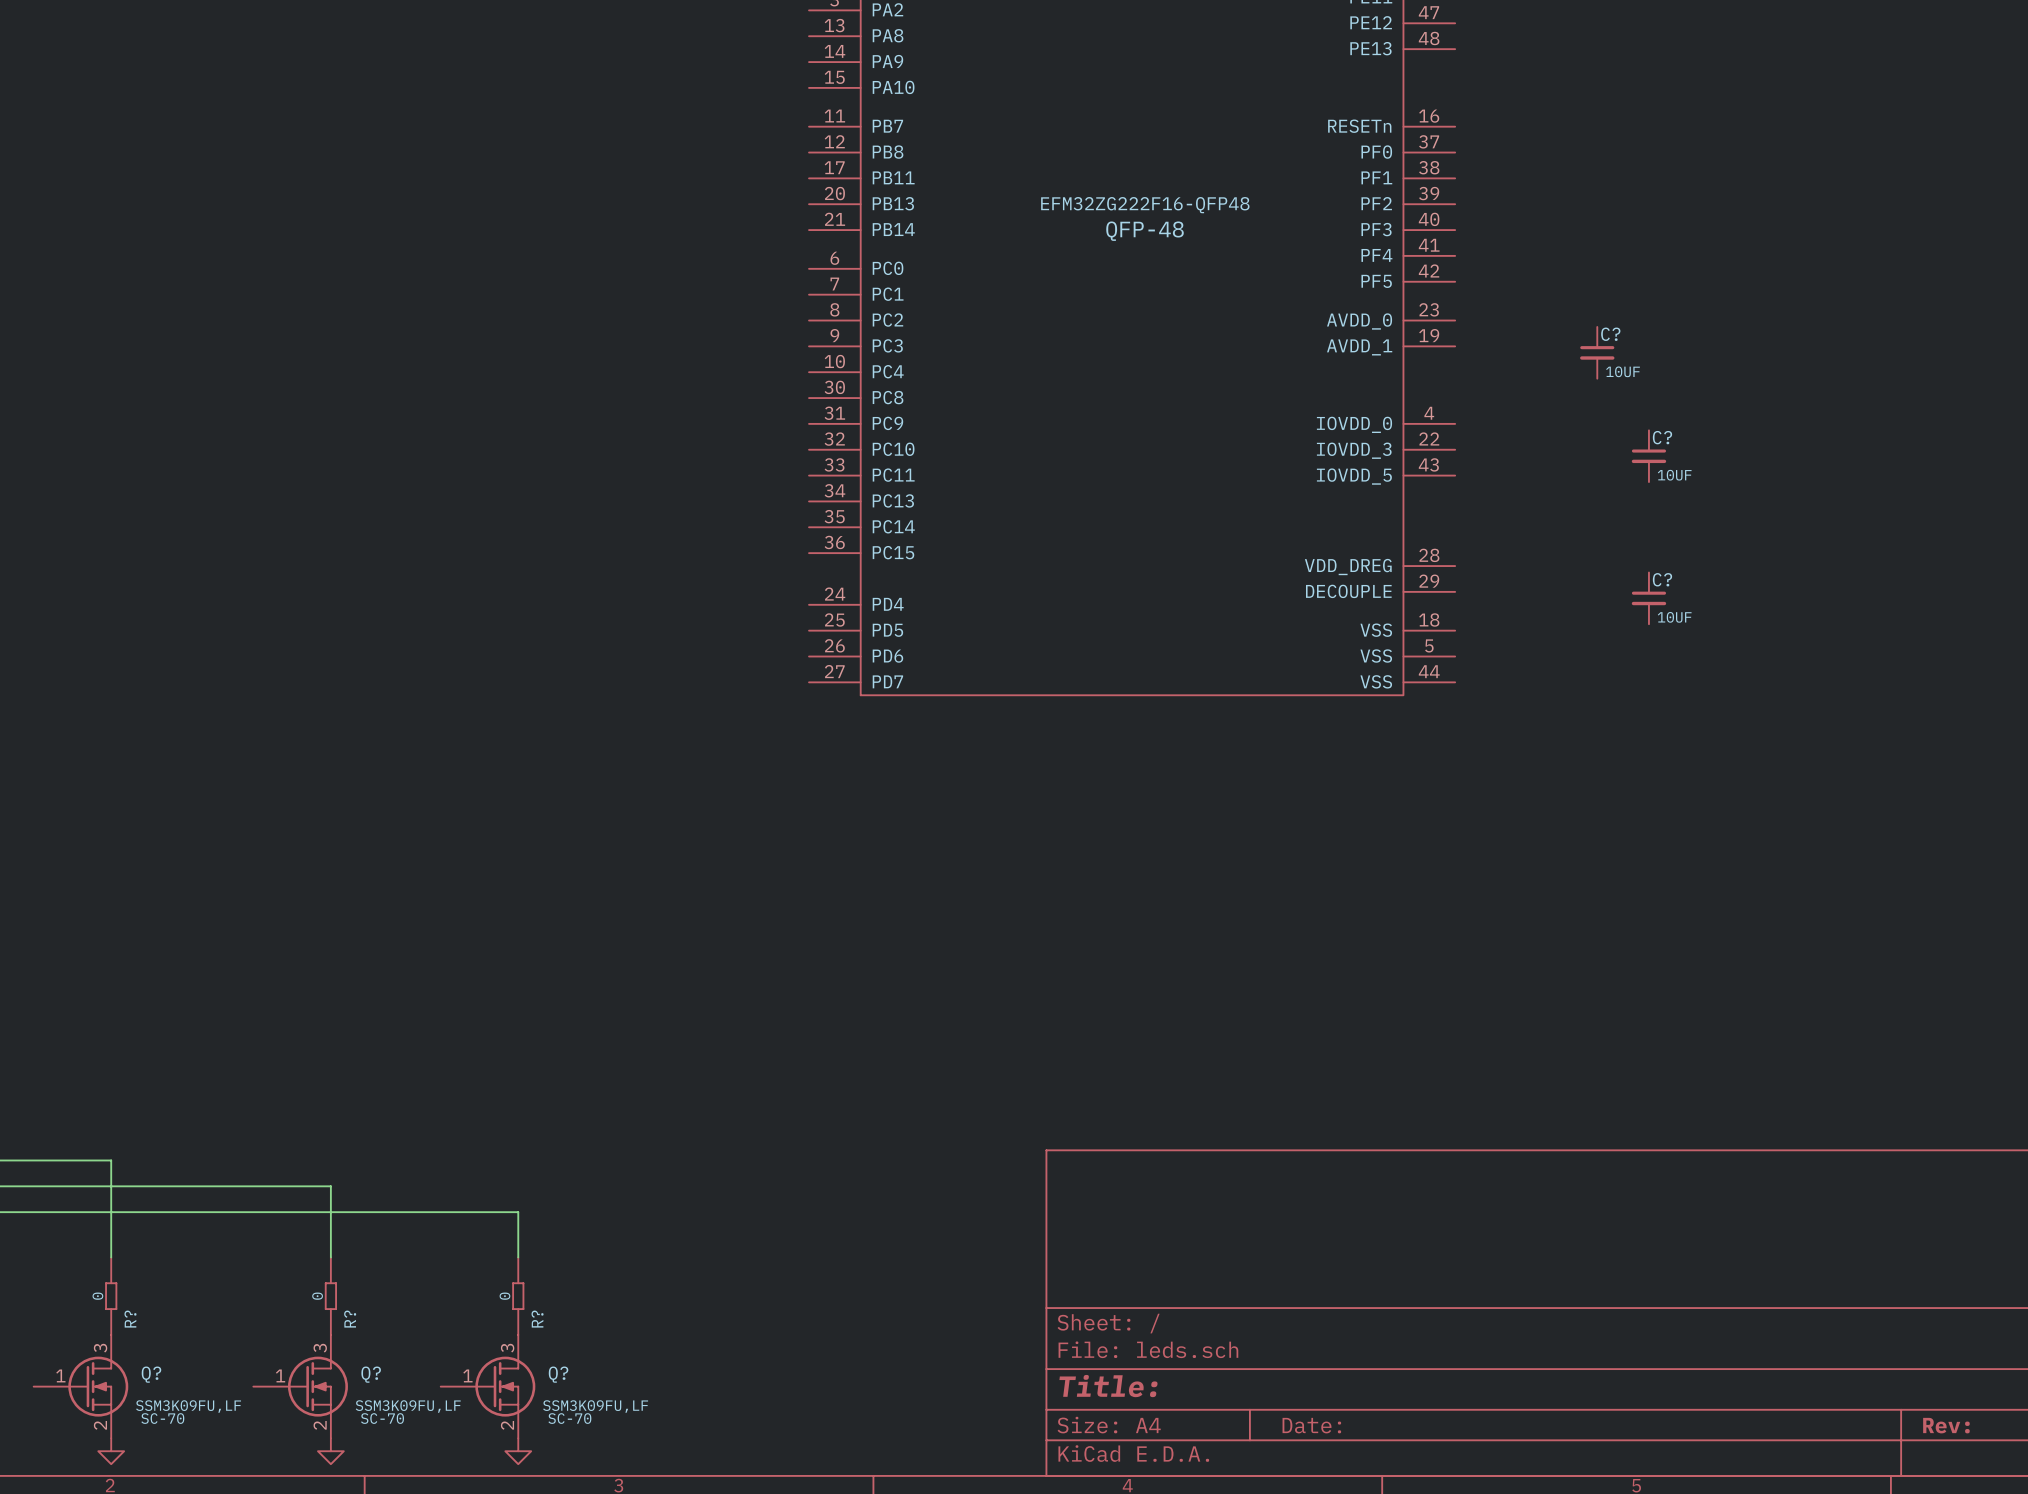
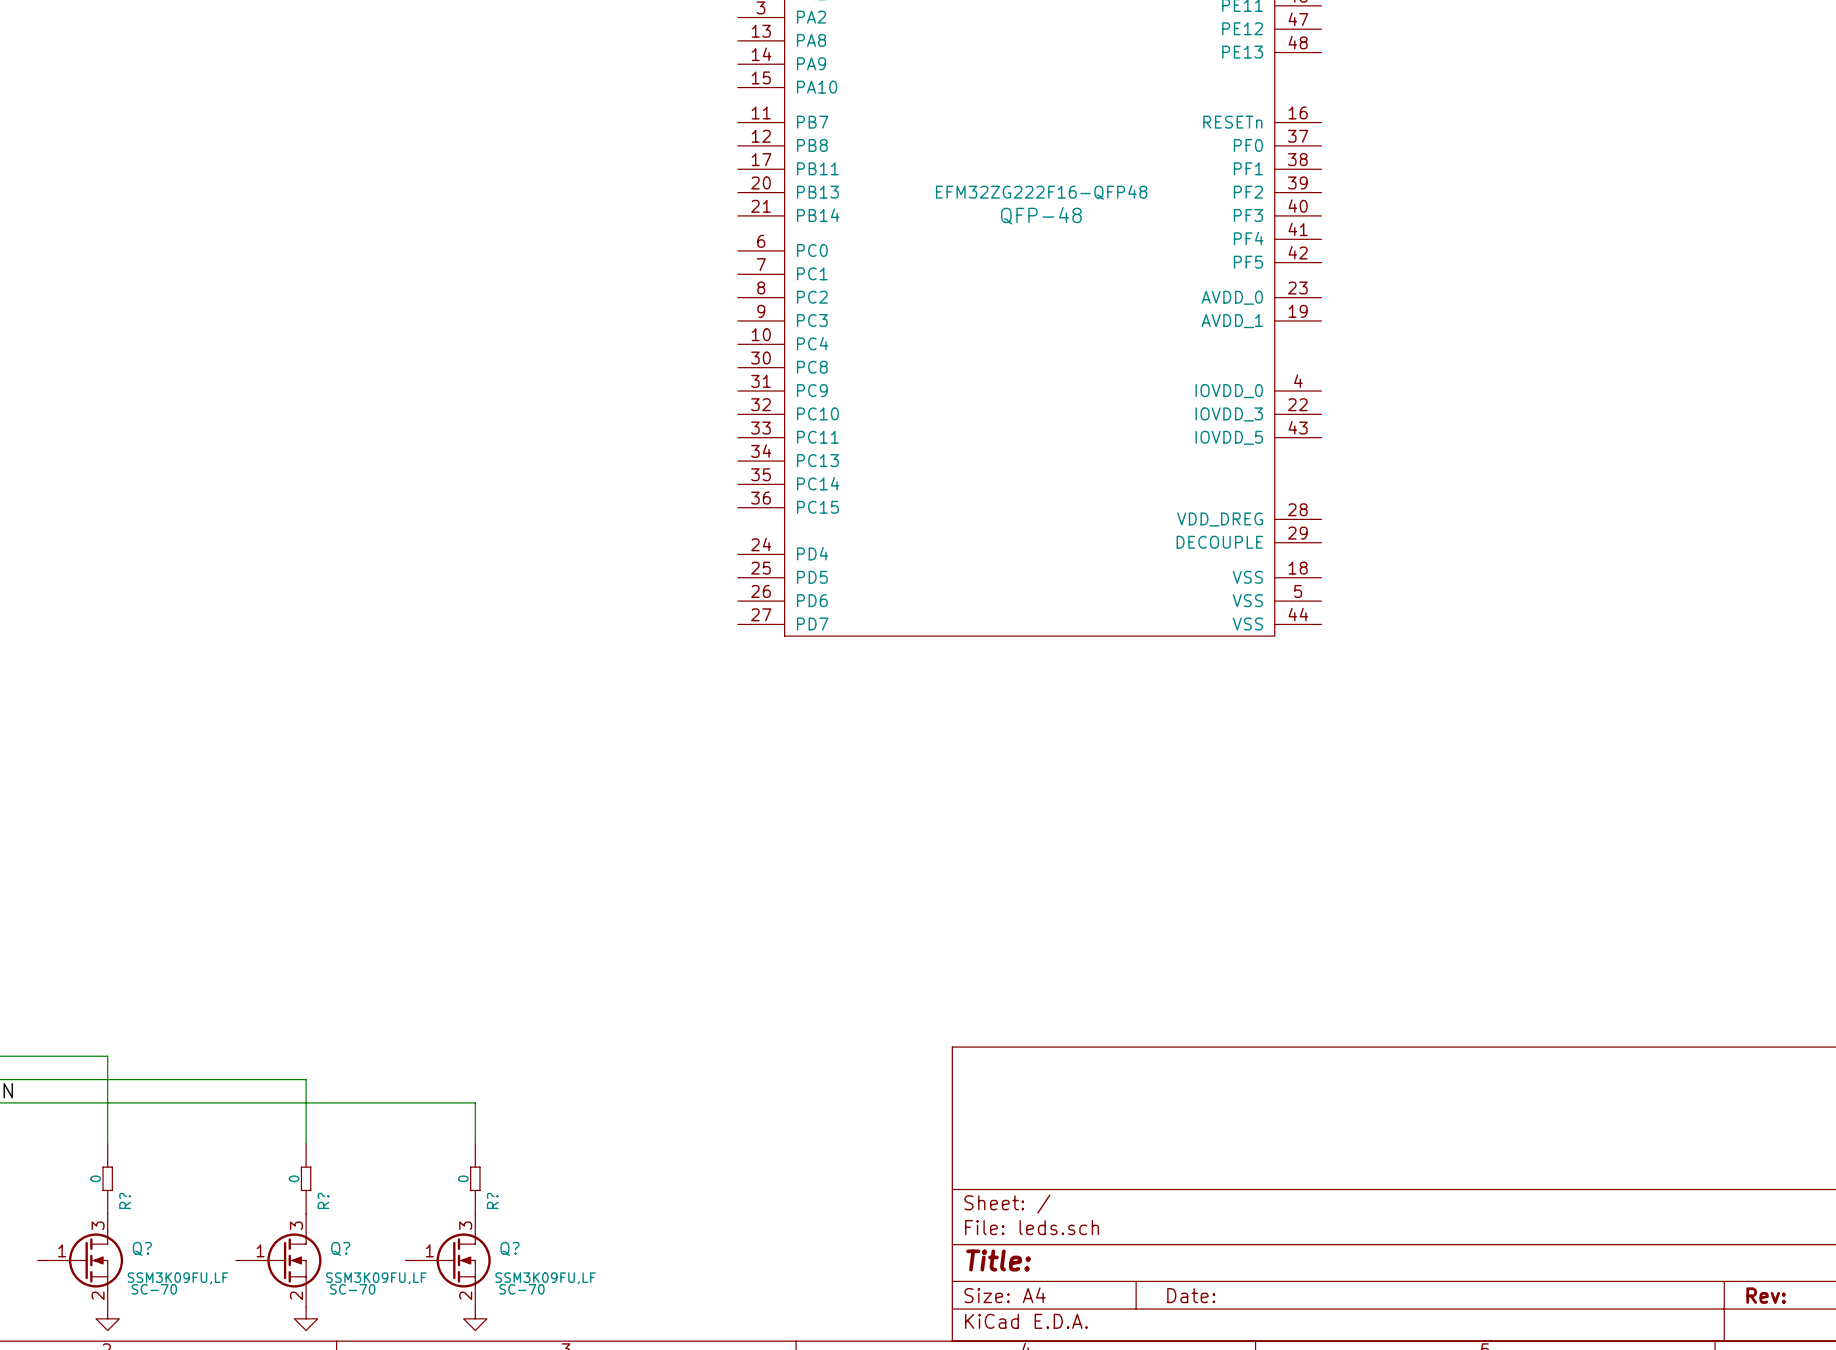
C?: (1597, 352) -> none
C?: (1648, 456) -> none
C?: (1648, 598) -> none

